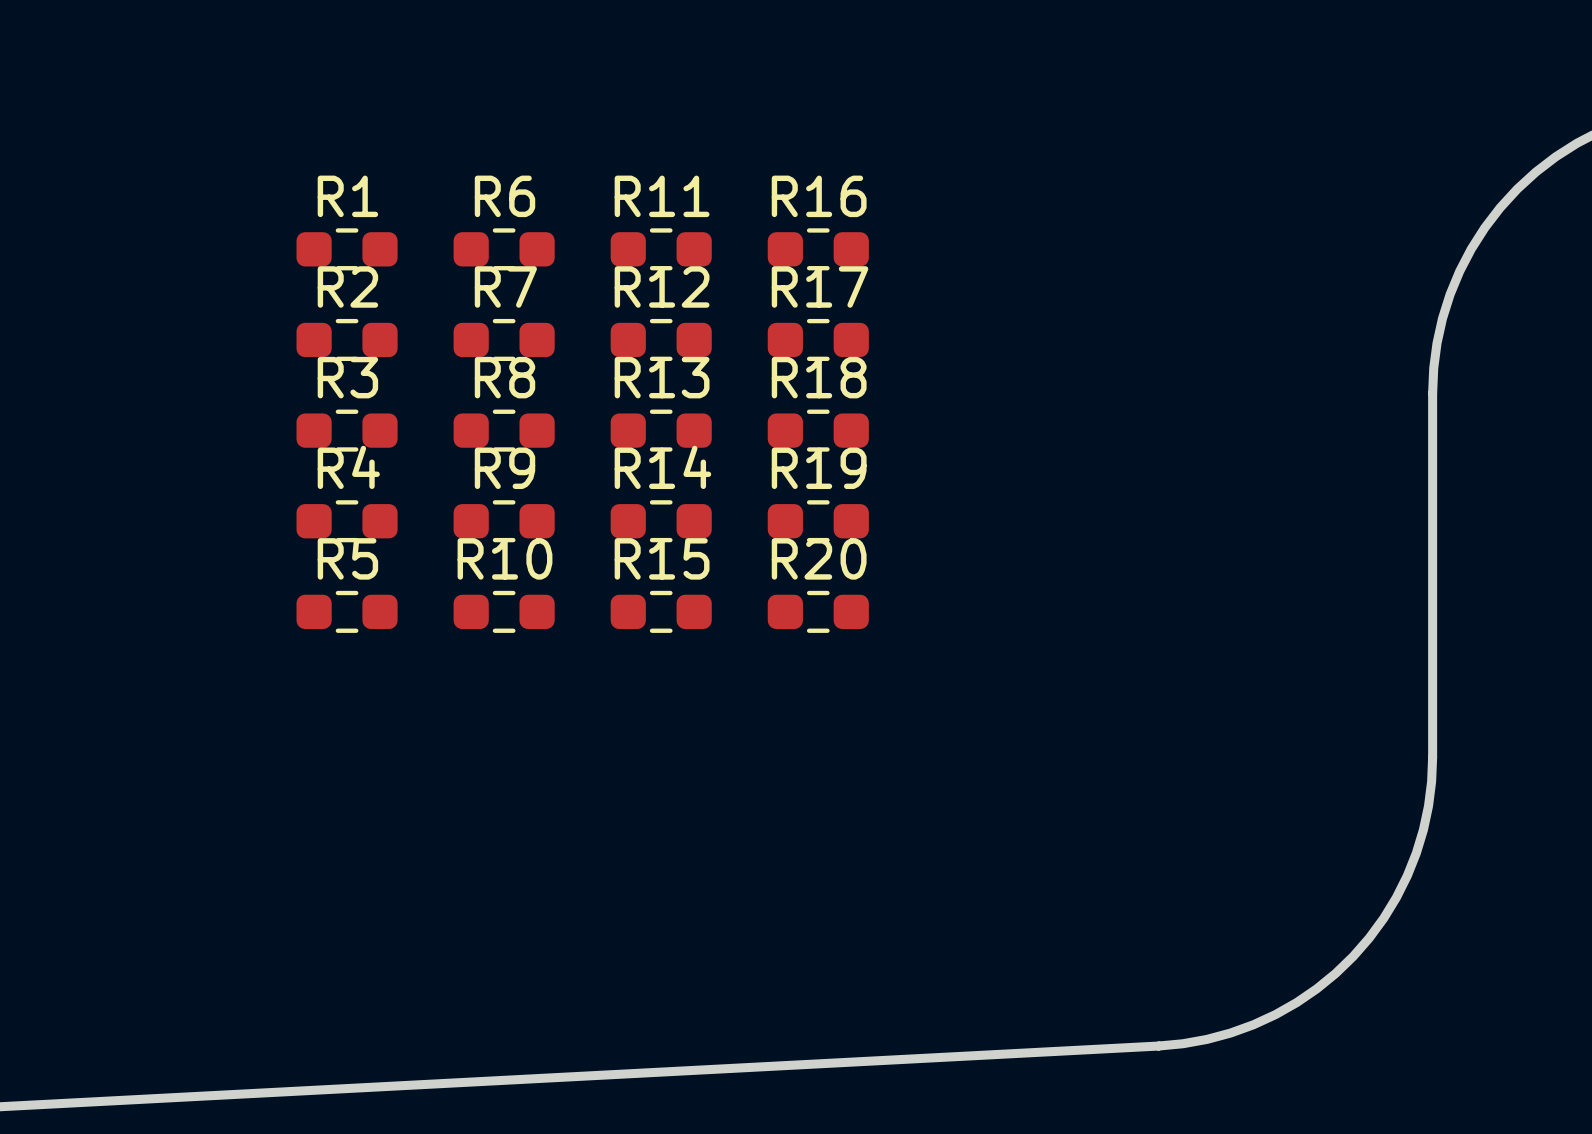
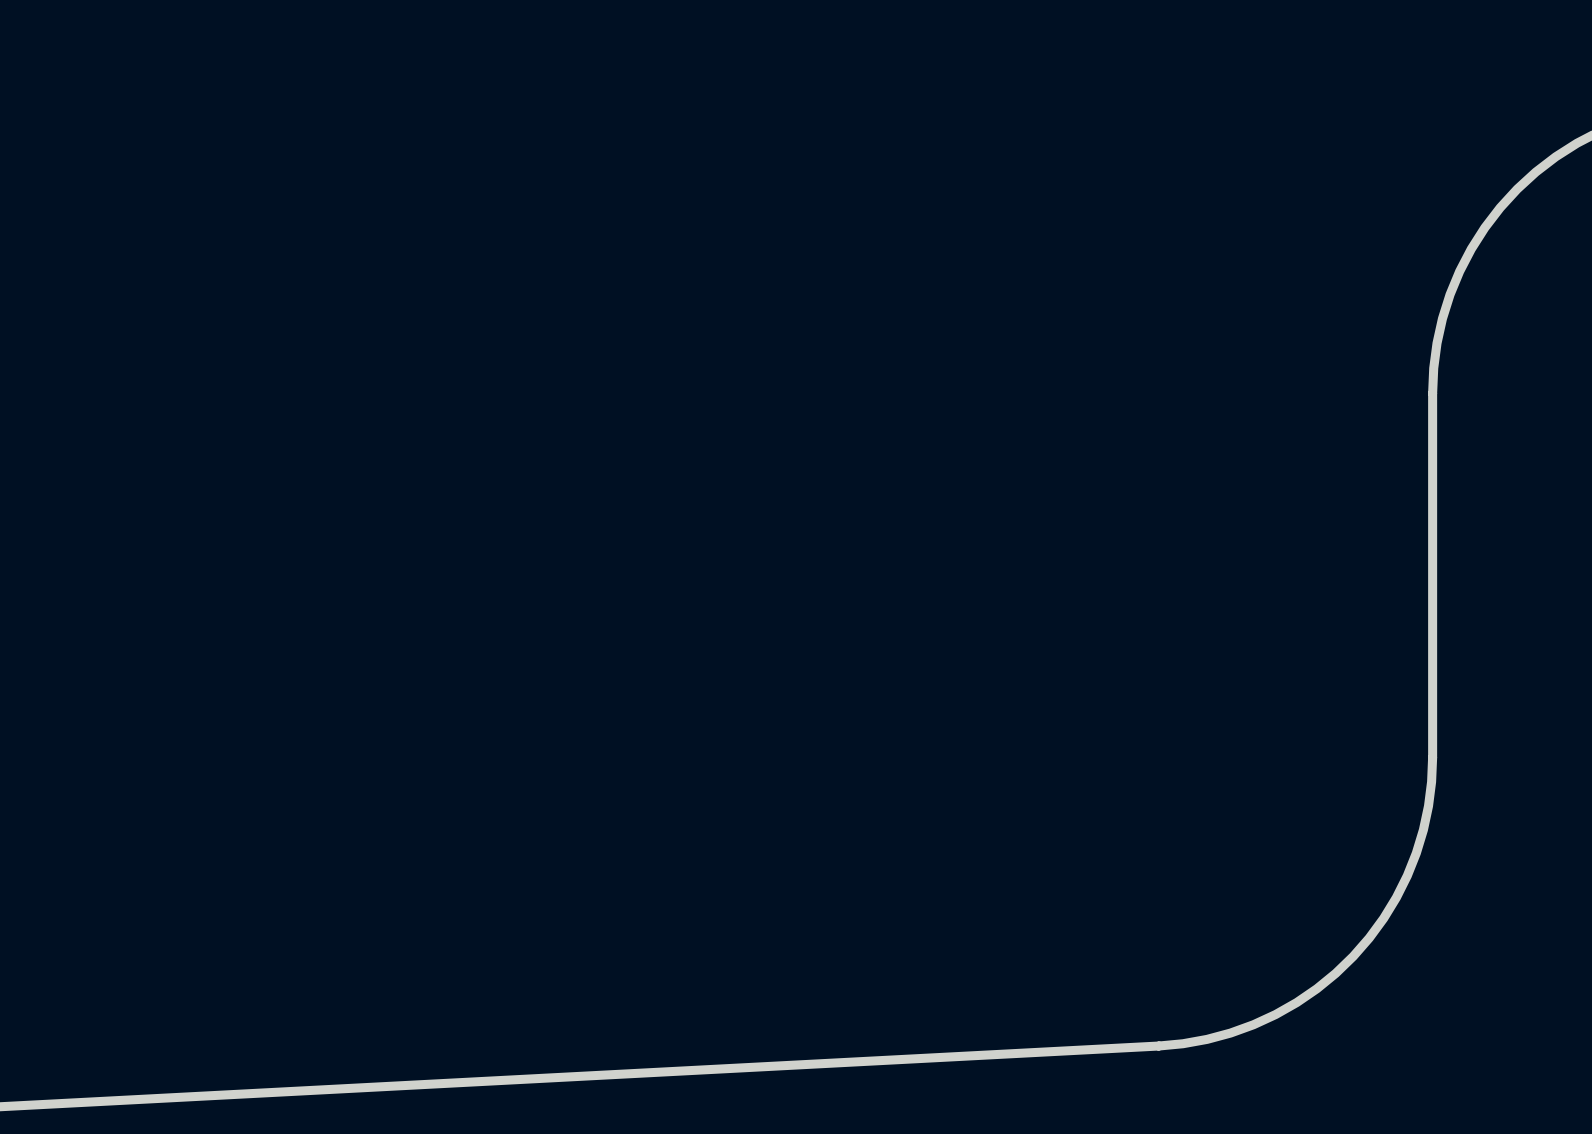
R1: (347, 249) -> none
R6: (504, 249) -> none
R11: (661, 249) -> none
R16: (818, 249) -> none
R2: (347, 339) -> none
R7: (504, 339) -> none
R12: (661, 339) -> none
R17: (818, 339) -> none
R3: (347, 430) -> none
R8: (504, 430) -> none
R13: (661, 430) -> none
R18: (818, 430) -> none
R4: (347, 521) -> none
R9: (504, 521) -> none
R14: (661, 521) -> none
R19: (818, 521) -> none
R5: (347, 611) -> none
R10: (504, 611) -> none
R15: (661, 611) -> none
R20: (818, 611) -> none

